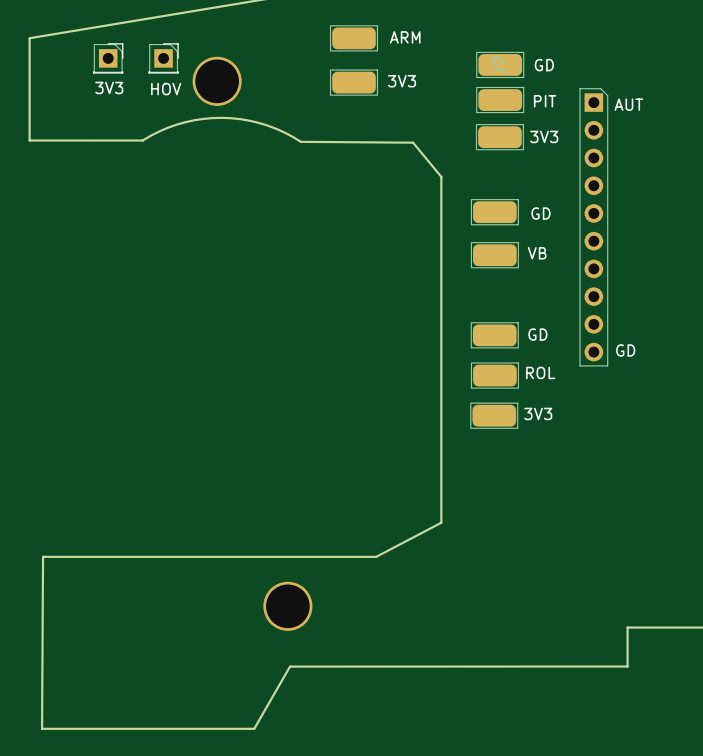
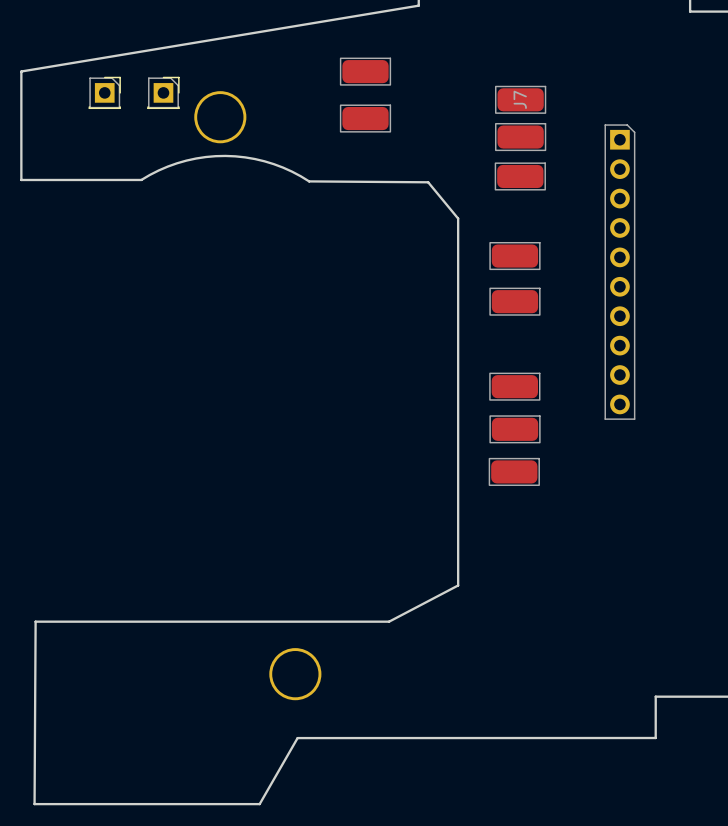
text: ARM (405, 37) -> none
text: GD (544, 65) -> none
text: 3V3 (402, 81) -> none
text: 3V3 (109, 87) -> none
text: HOV (166, 89) -> none
text: PIT (545, 101) -> none
text: AUT (628, 104) -> none
text: 3V3 (544, 136) -> none
text: GD (540, 213) -> none
text: VB (537, 253) -> none
text: GD (537, 334) -> none
text: GD (625, 350) -> none
text: ROL (540, 372) -> none
text: 3V3 (538, 413) -> none

